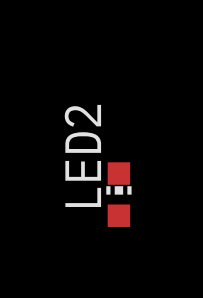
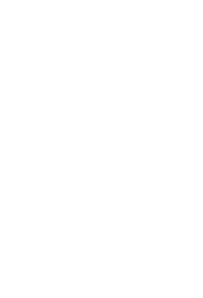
LED2: (118, 194) -> none

